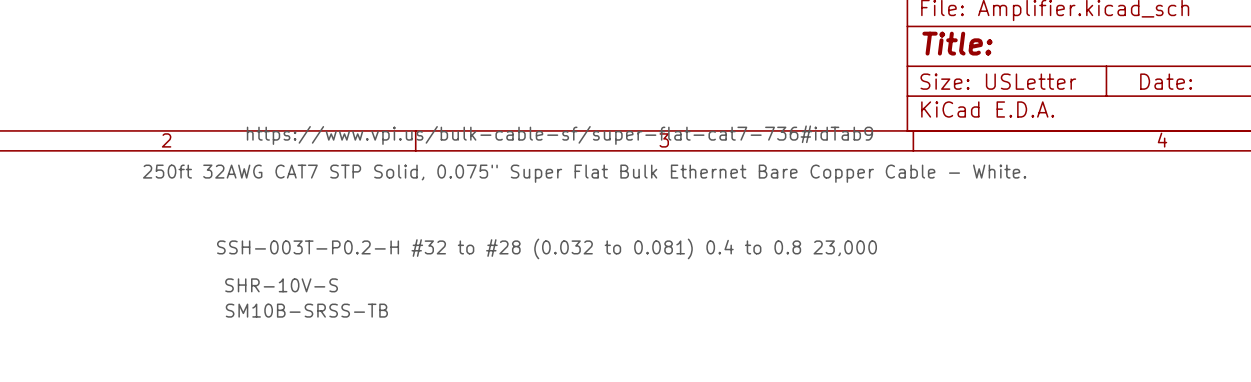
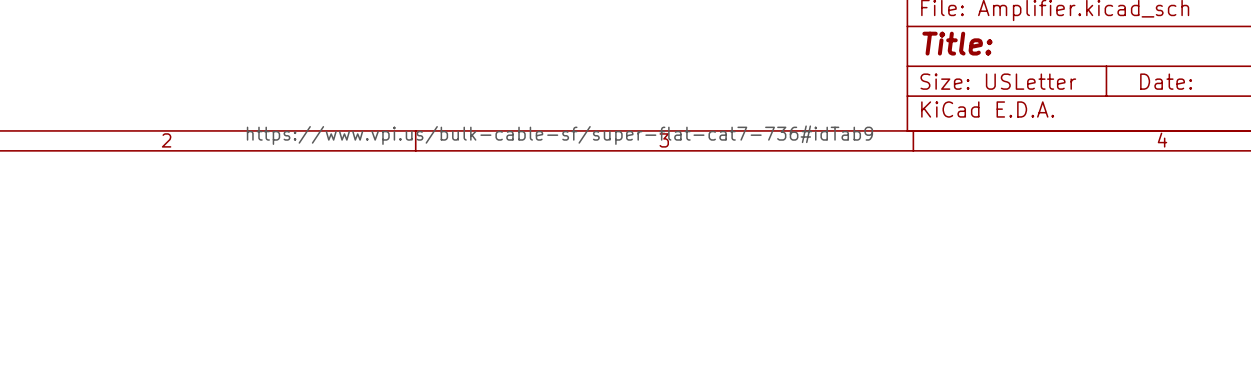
text: 250ft 32AWG CAT7 STP Solid, 0.075" Super Flat Bulk Ethernet Bare Copper Cable - White. (584, 173) -> none
text: SSH-003T-P0.2-H #32 to #28 (0.032 to 0.081) 0.4 to 0.8 23,000 (547, 248) -> none
text: SHR-10V-S (281, 285) -> none
text: SM10B-SRSS-TB (306, 310) -> none

